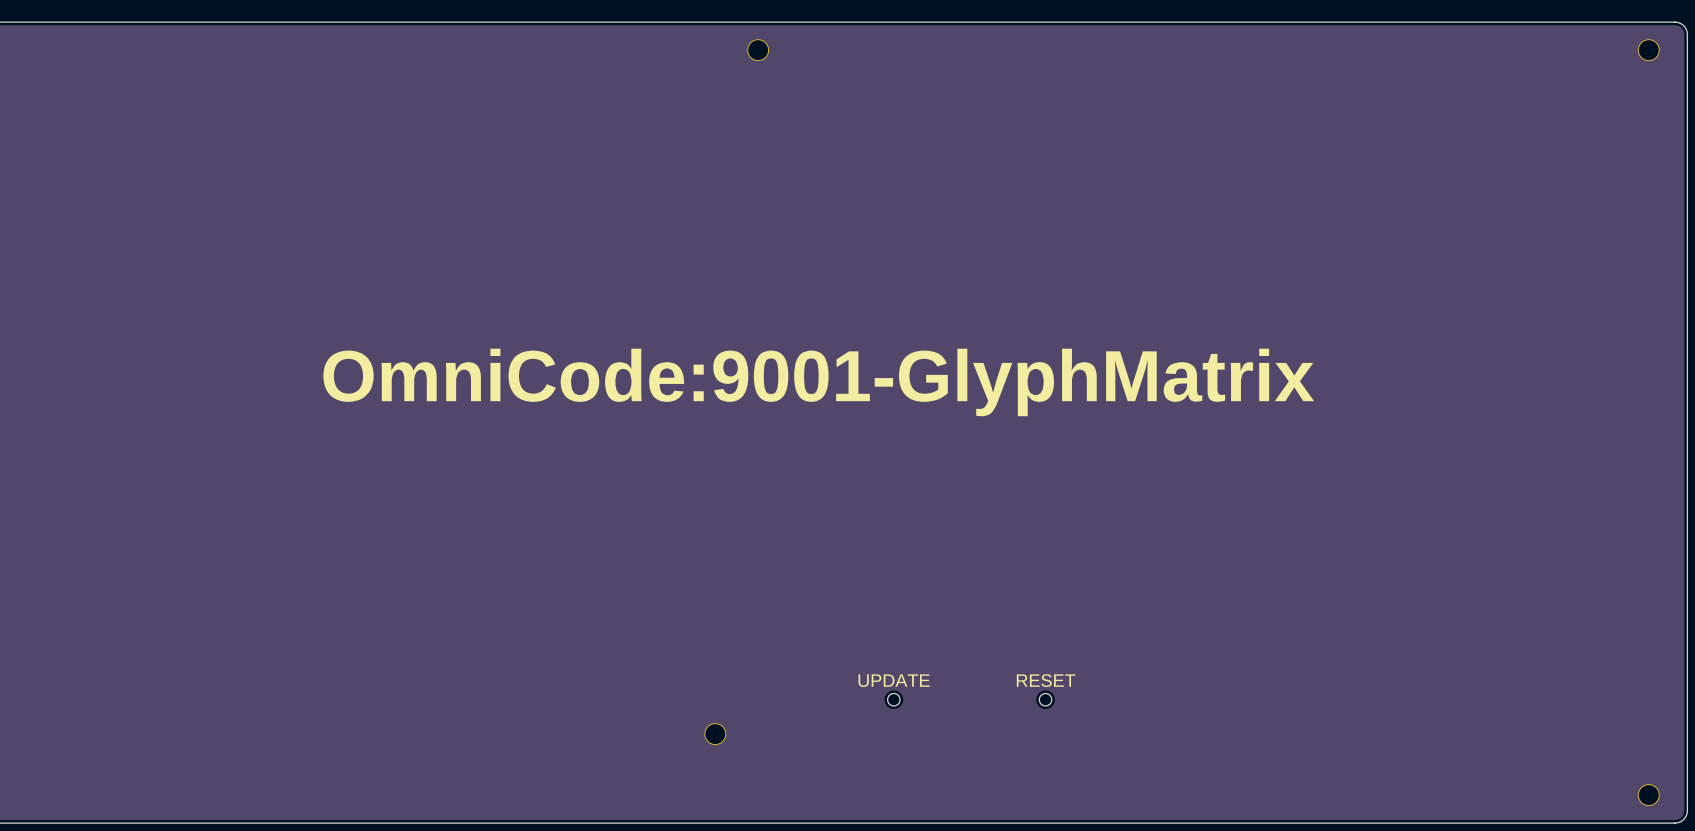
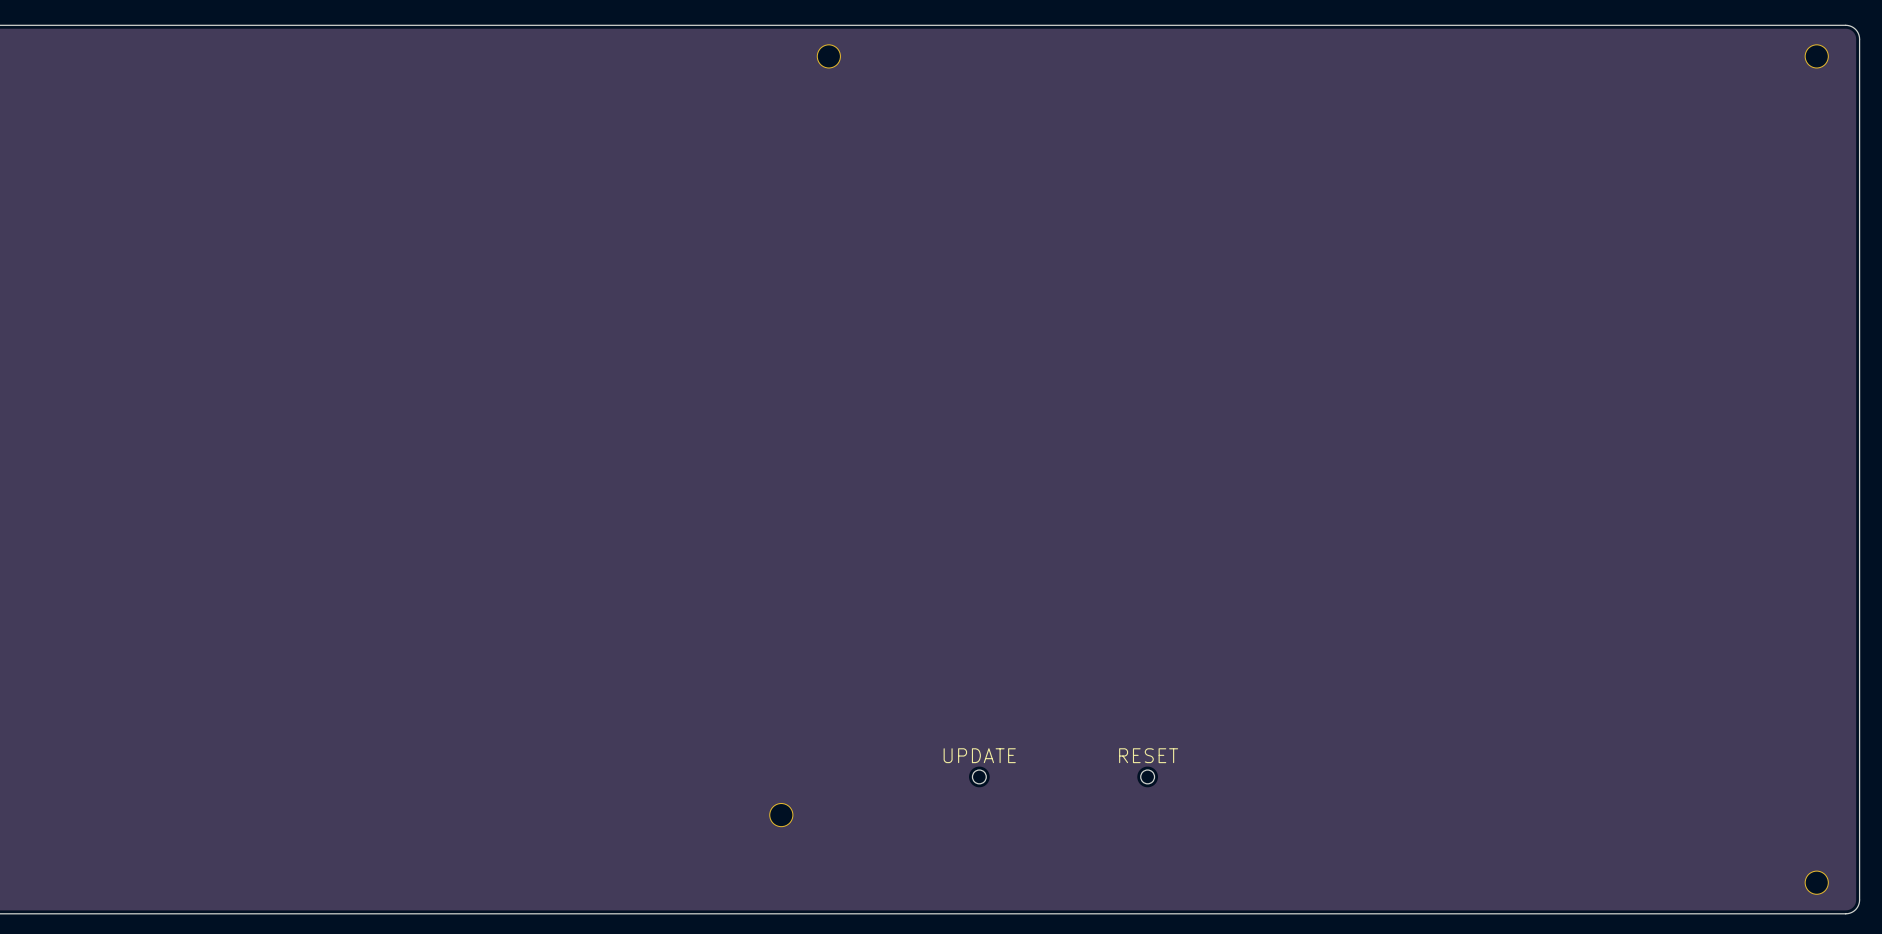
text: OmniCode:9001-GlyphMatrix (818, 382) -> none

